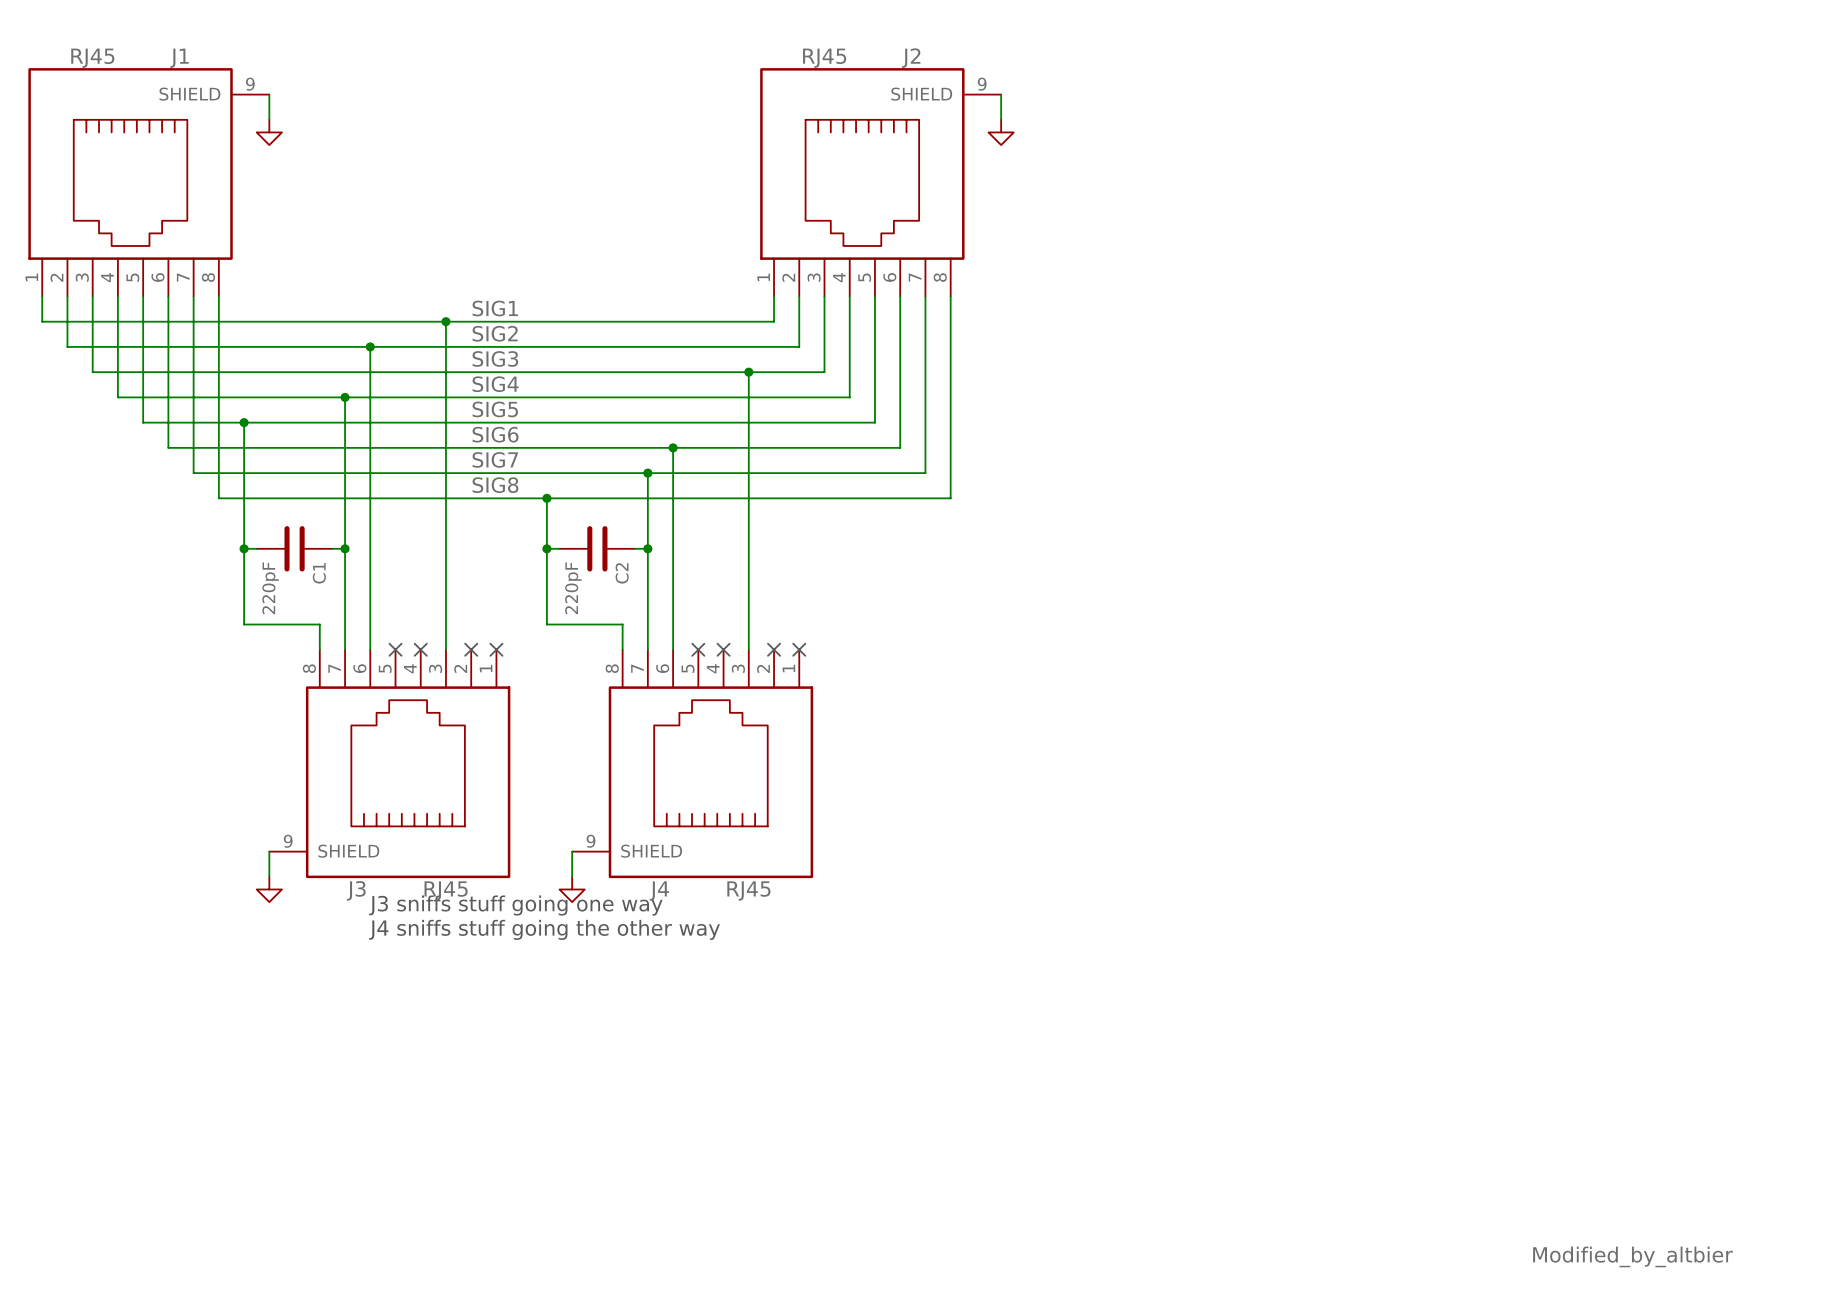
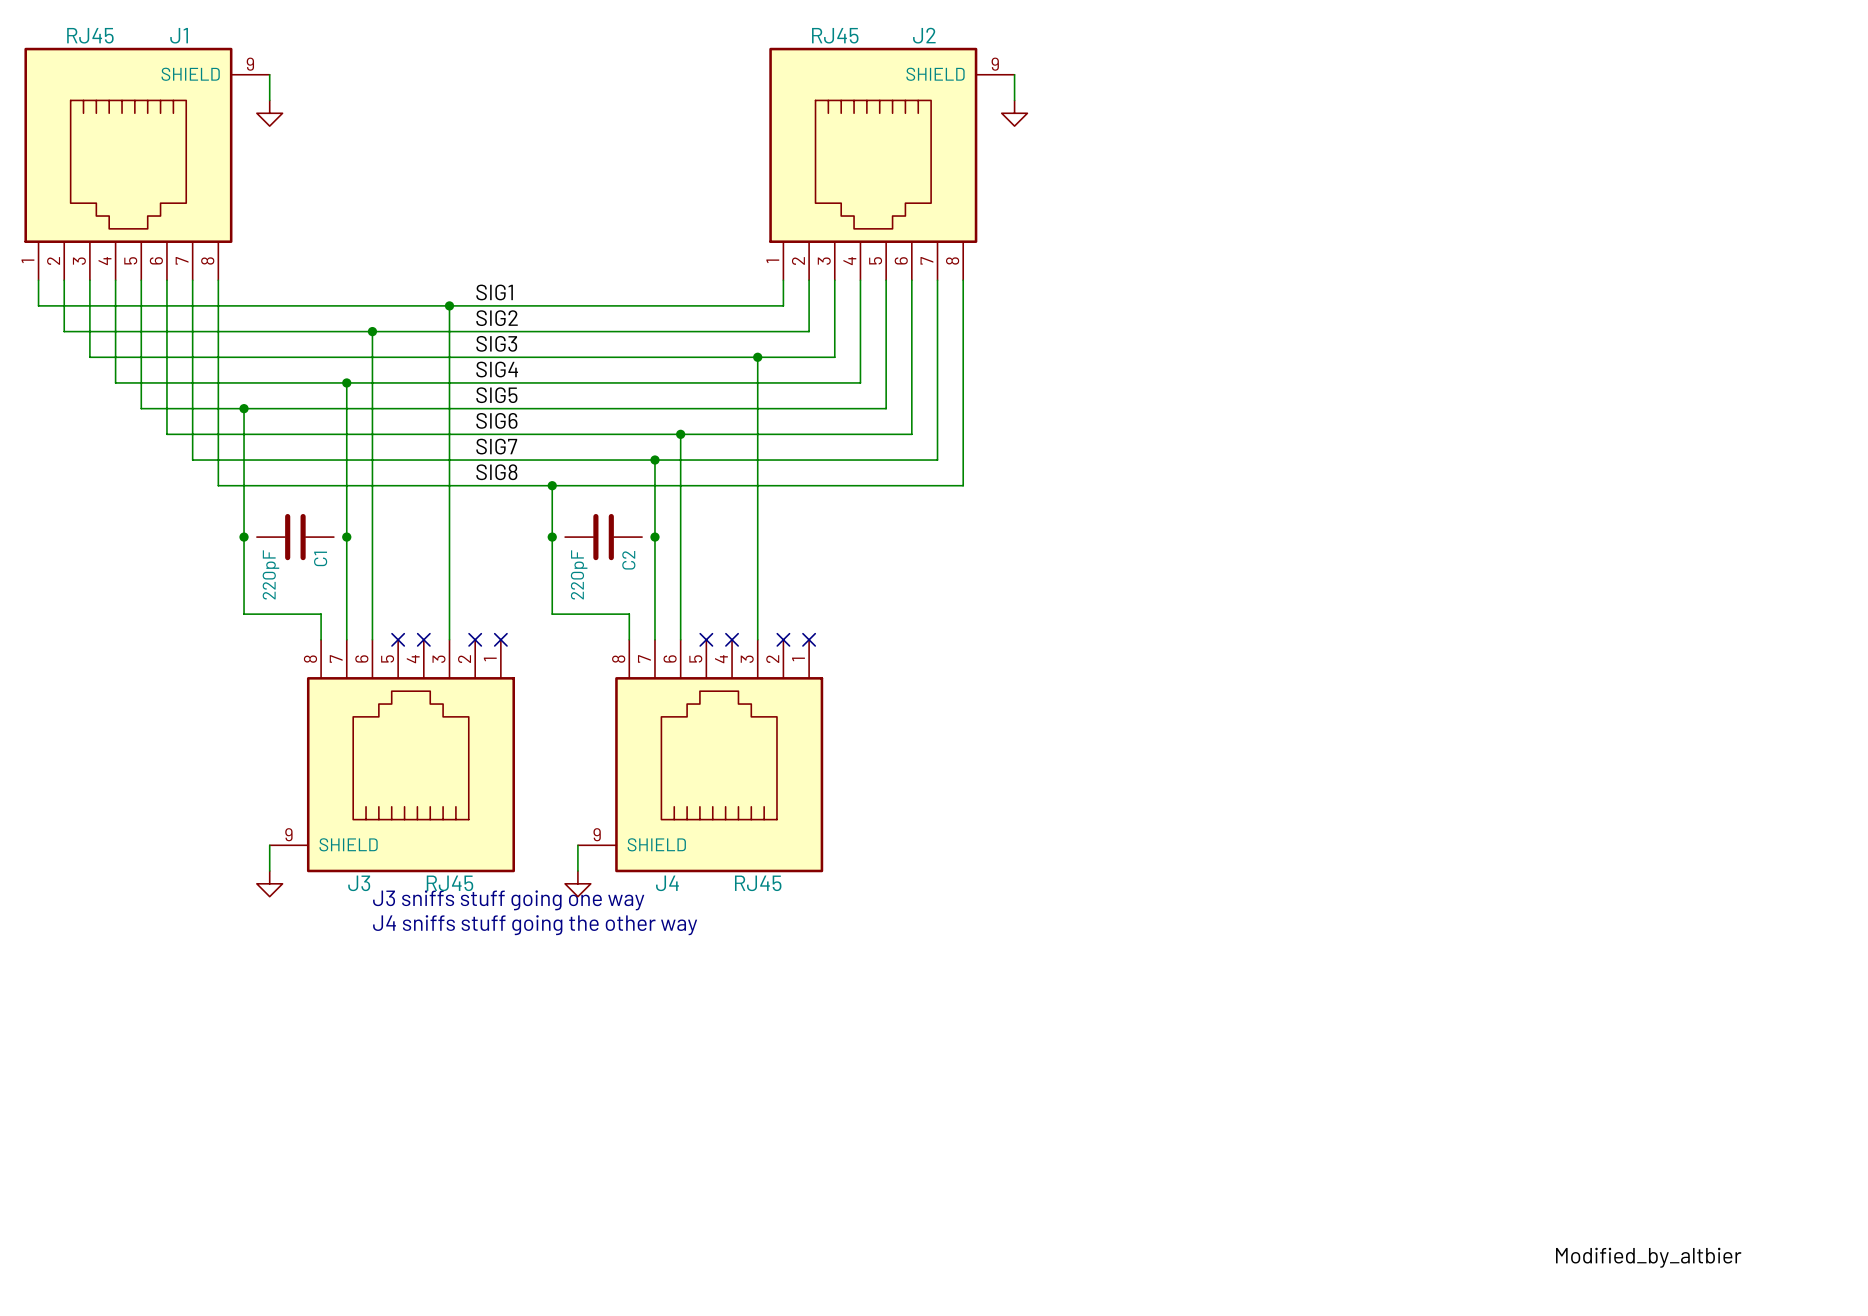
wire: (244, 548) (256, 548) -> none
wire: (332, 548) (345, 548) -> none
wire: (546, 548) (559, 548) -> none
wire: (635, 548) (647, 548) -> none

